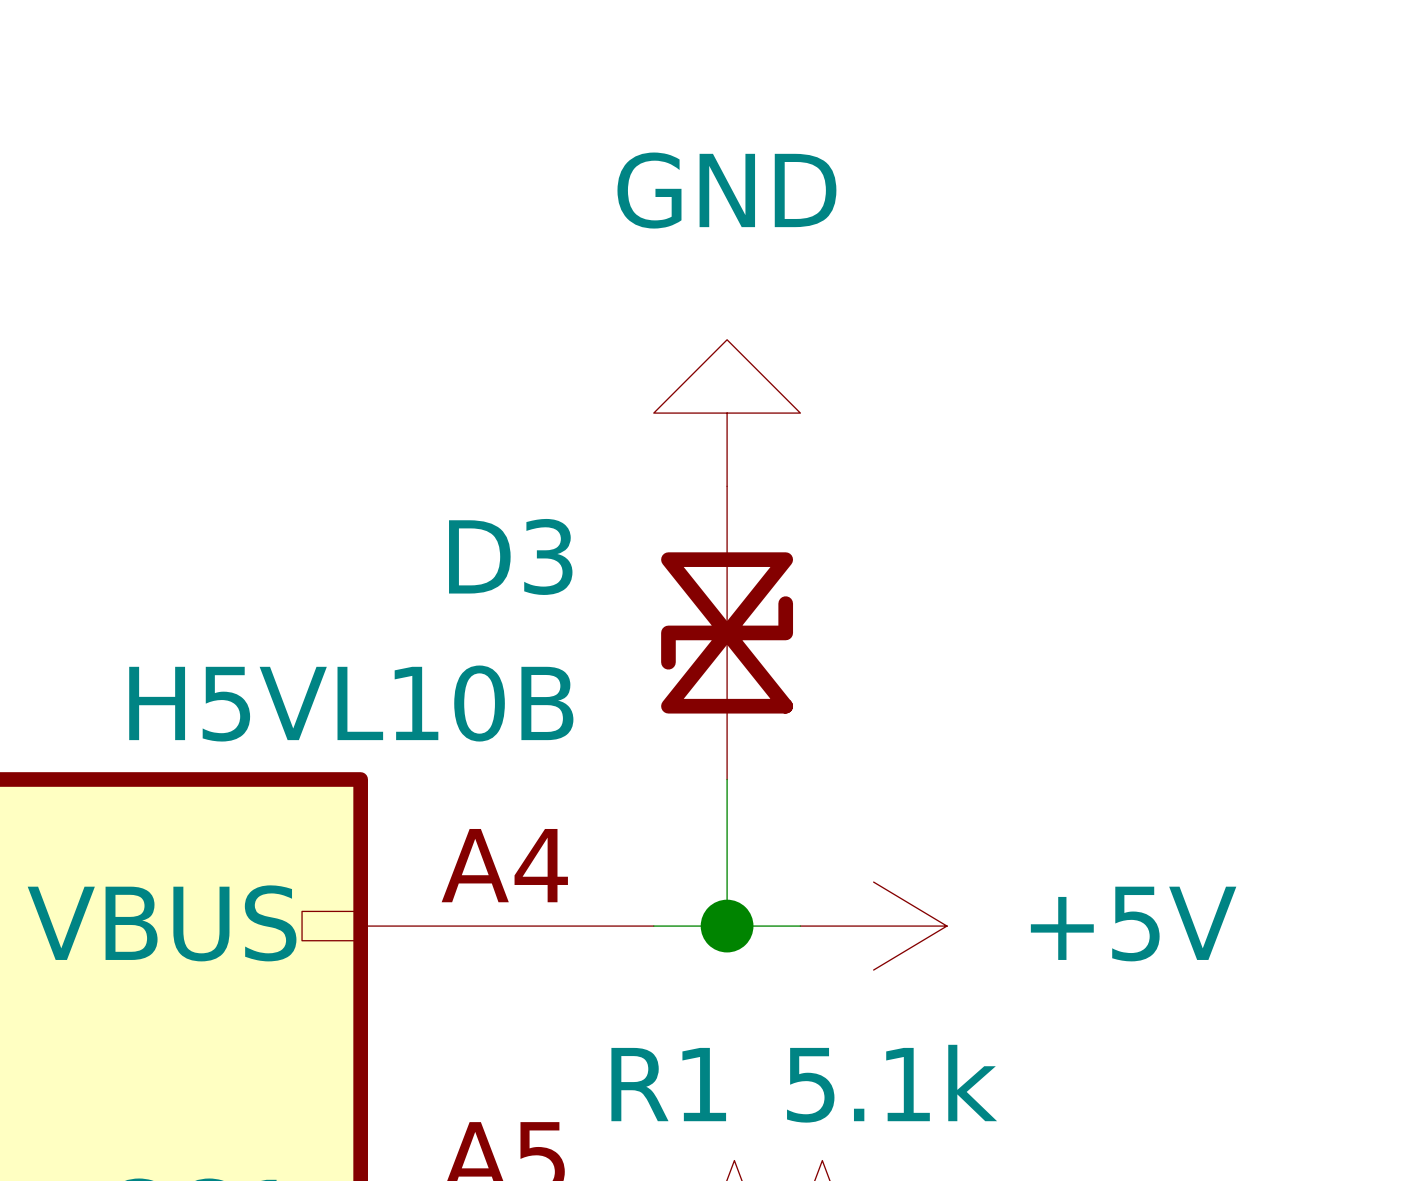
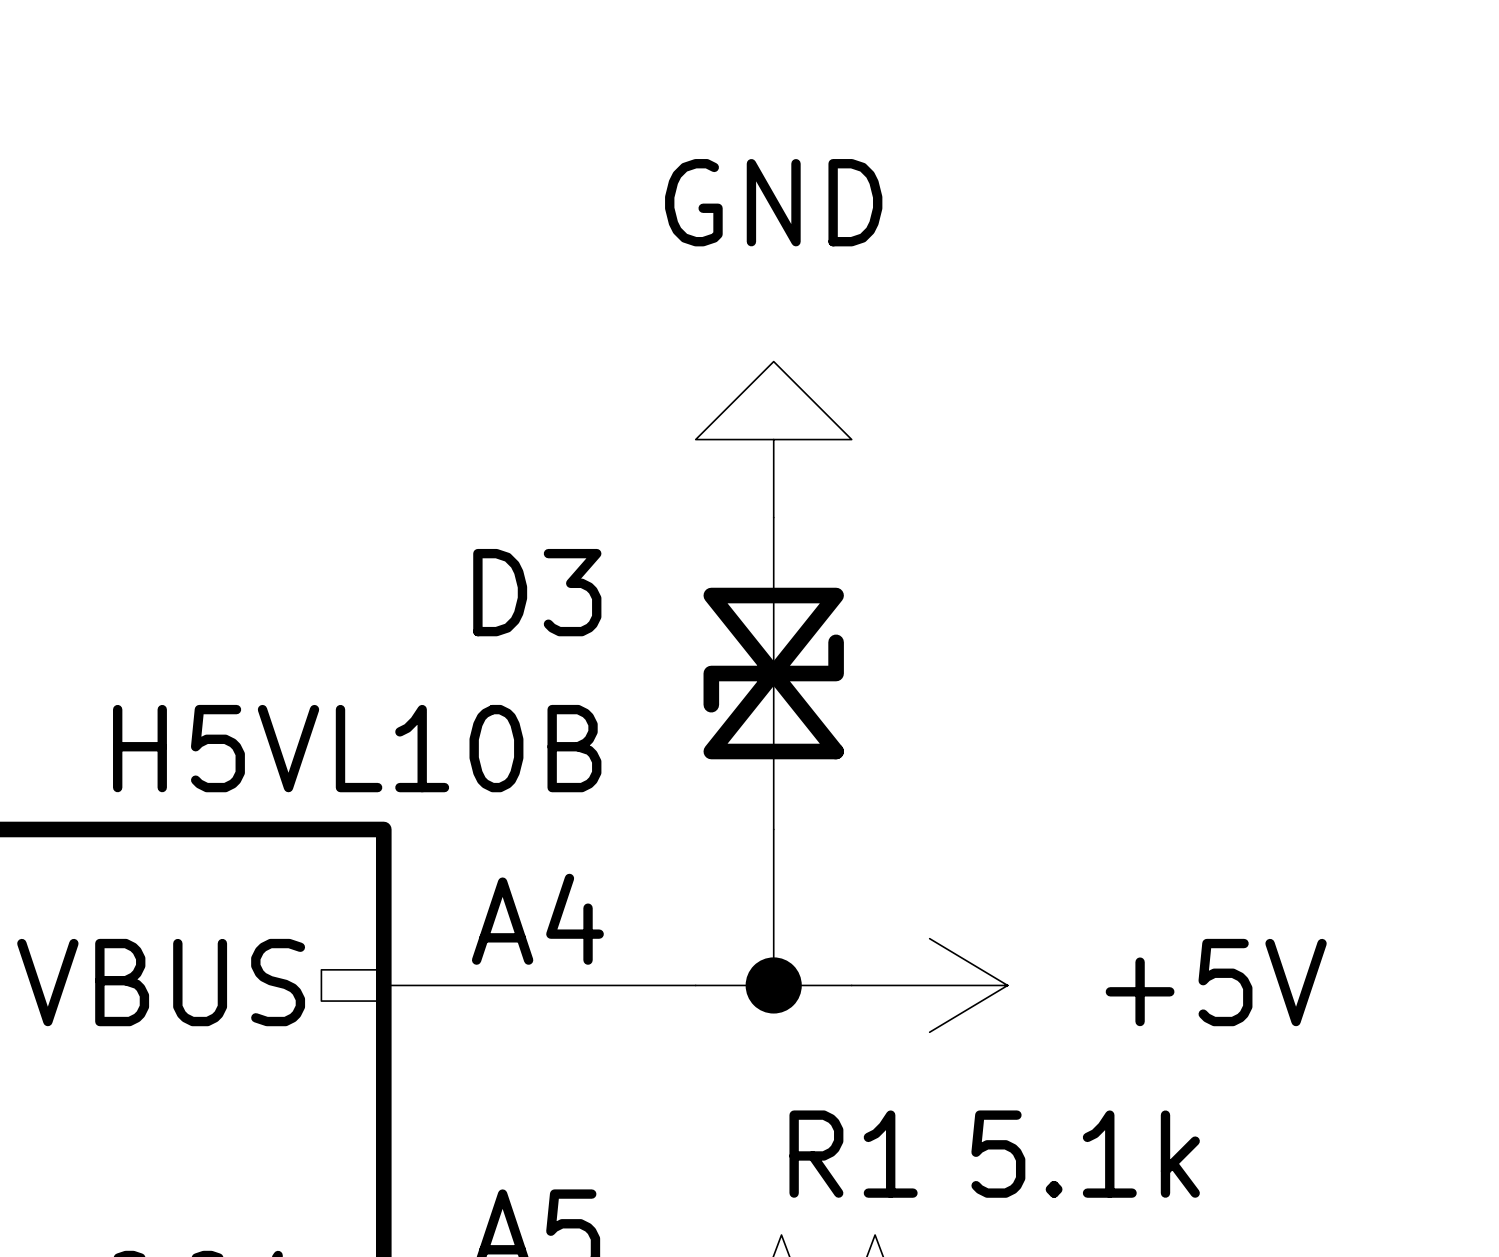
R1 value position: 5.1k (892, 1083) -> 5.1k (1085, 1154)
R1 name position: R1 (668, 1084) -> R1 (853, 1154)

